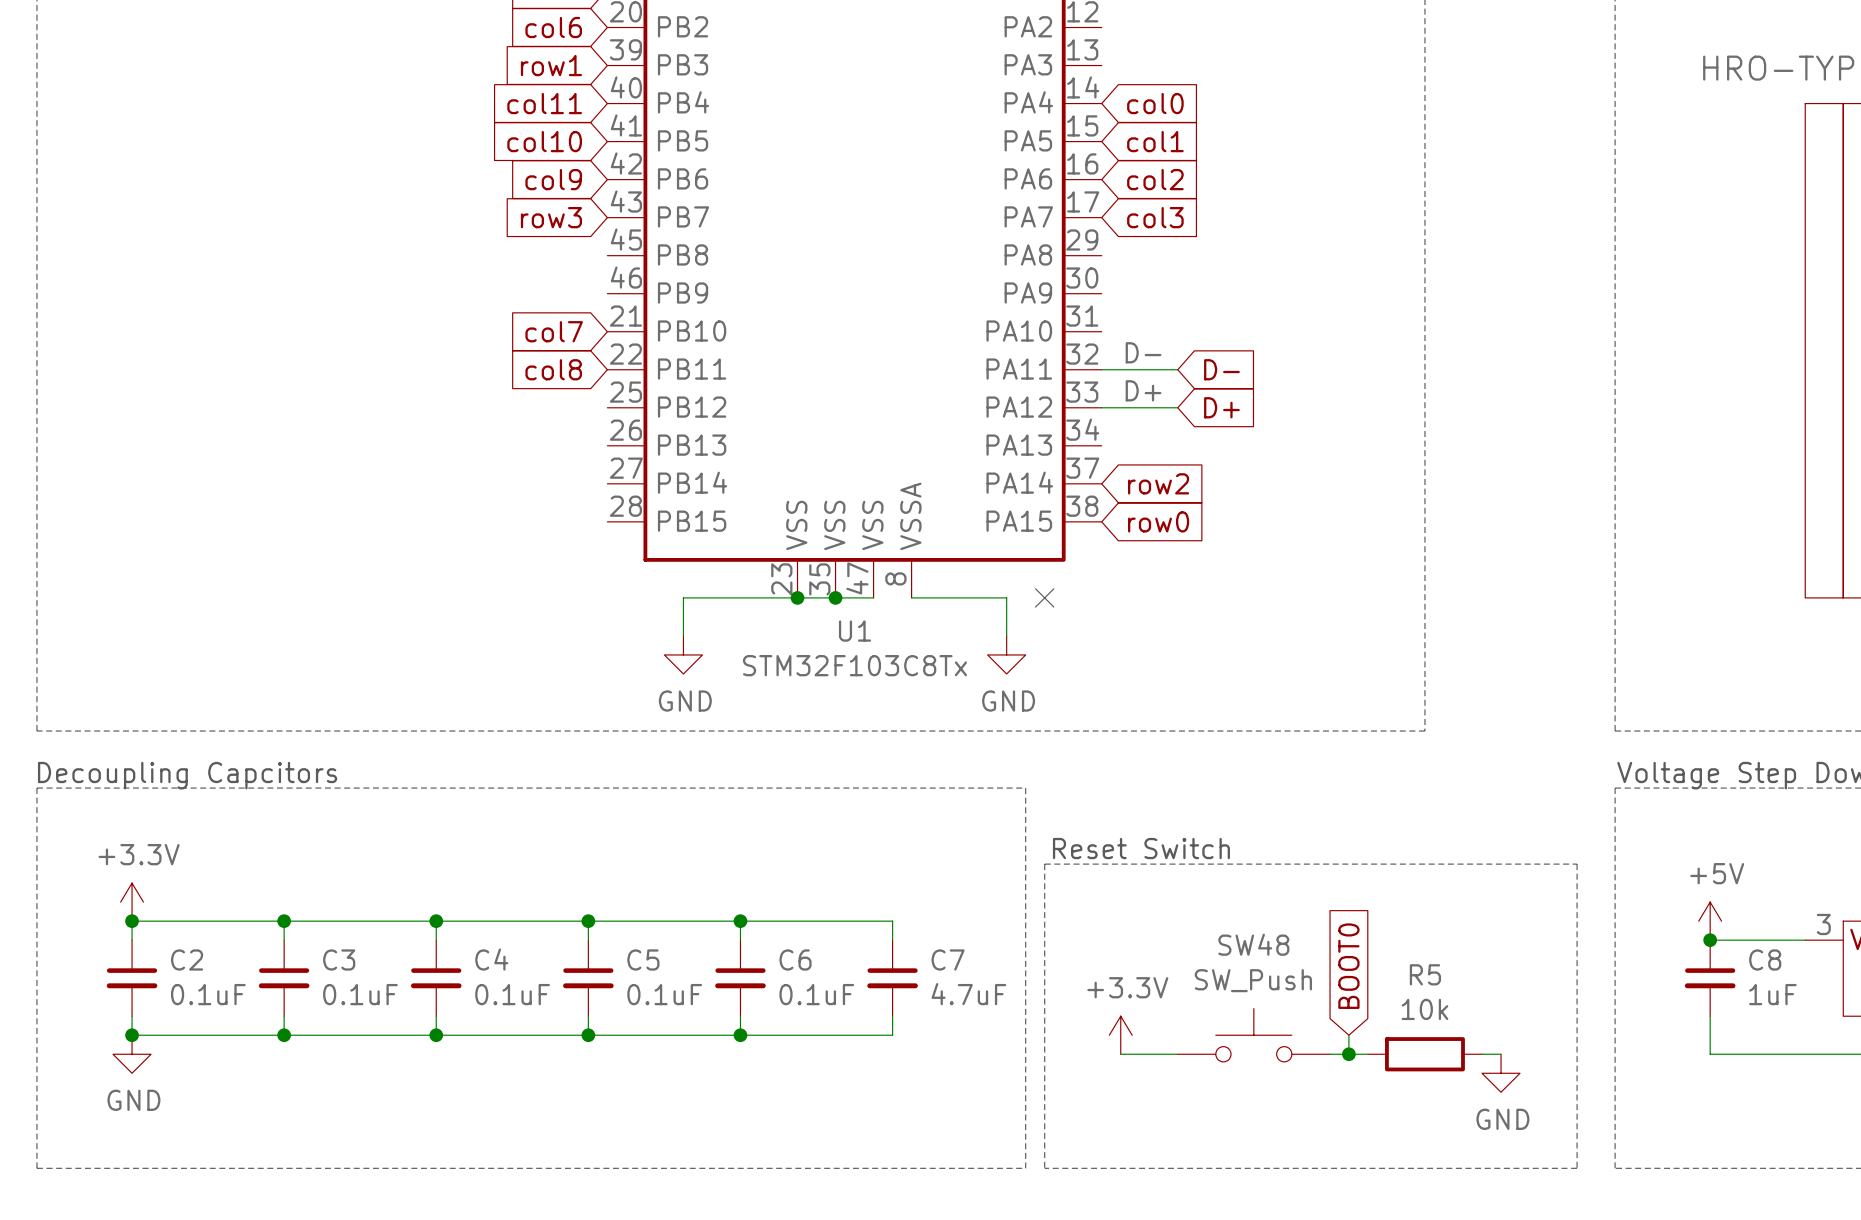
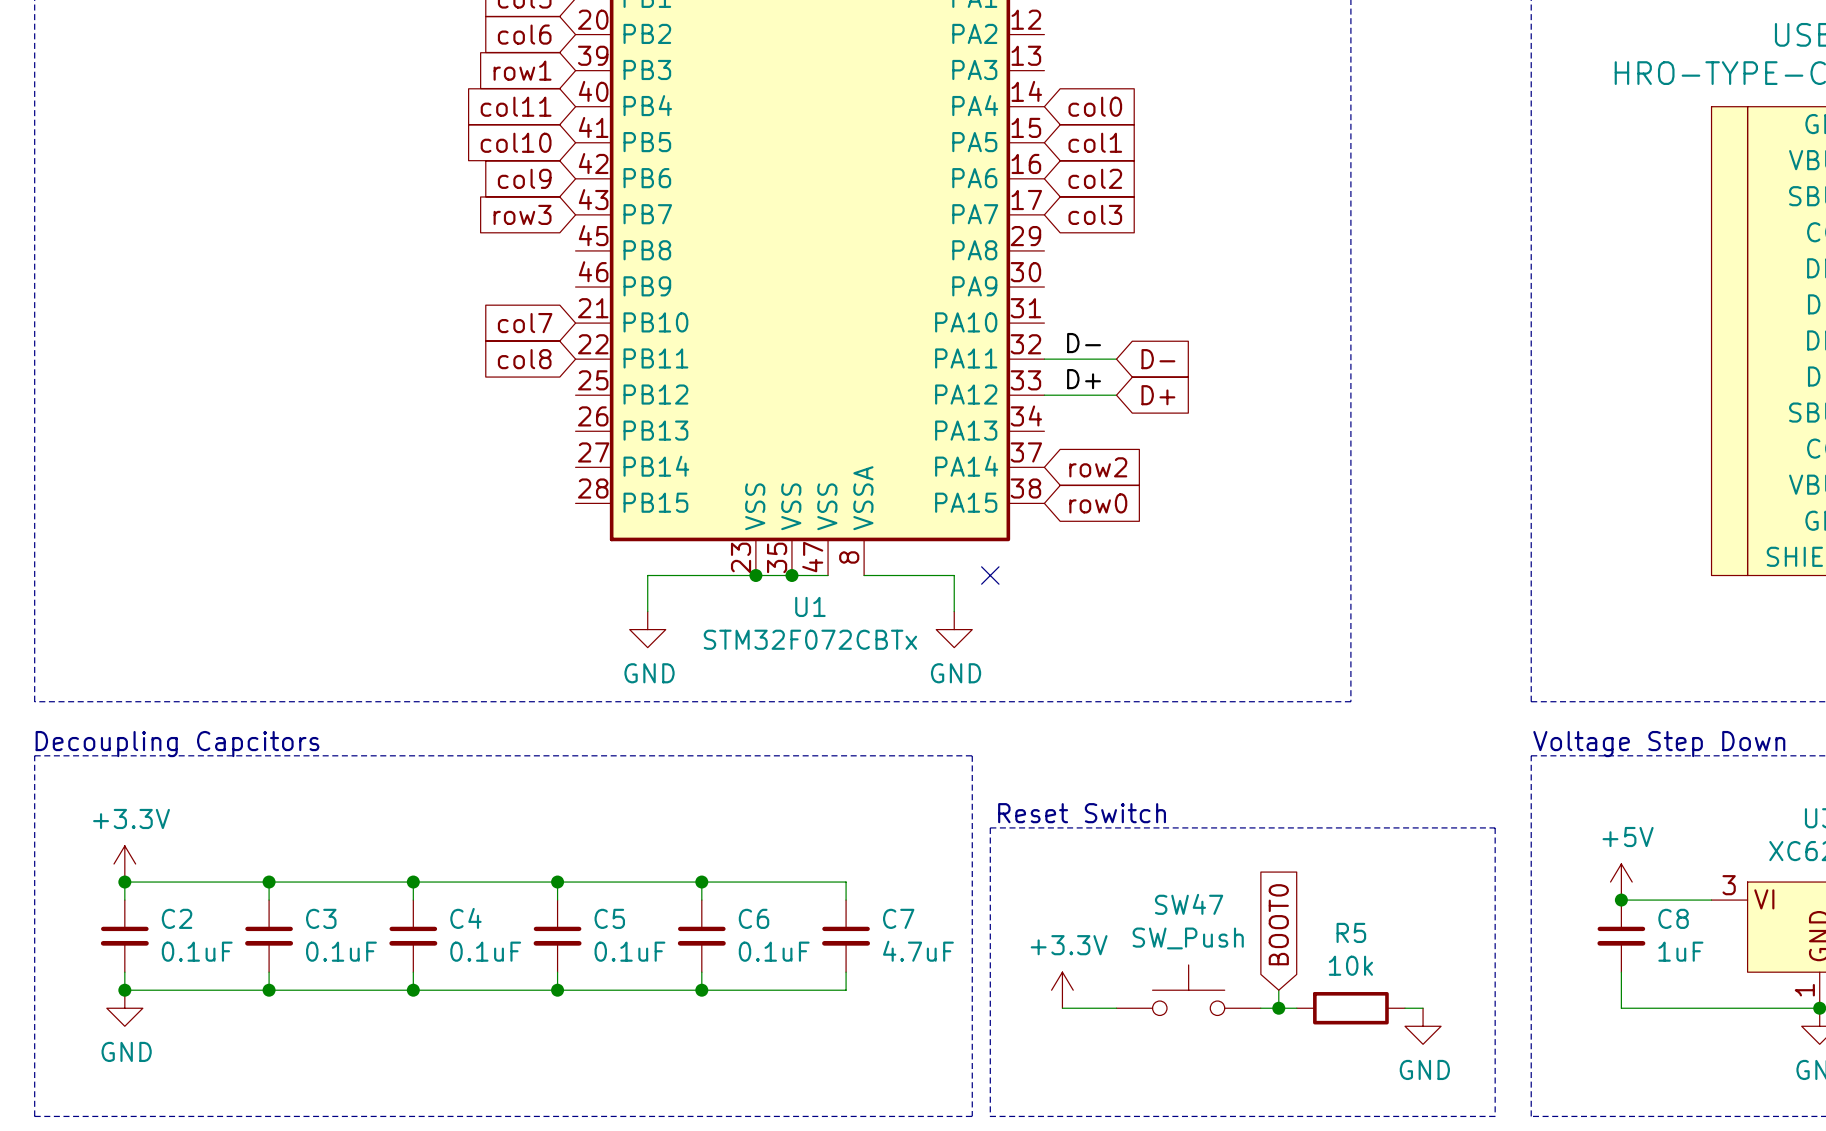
U1 value: STM32F103C8Tx (855, 665) -> STM32F072CBTx (810, 639)
SW48 name: SW48 (1253, 944) -> SW47 (1189, 904)

